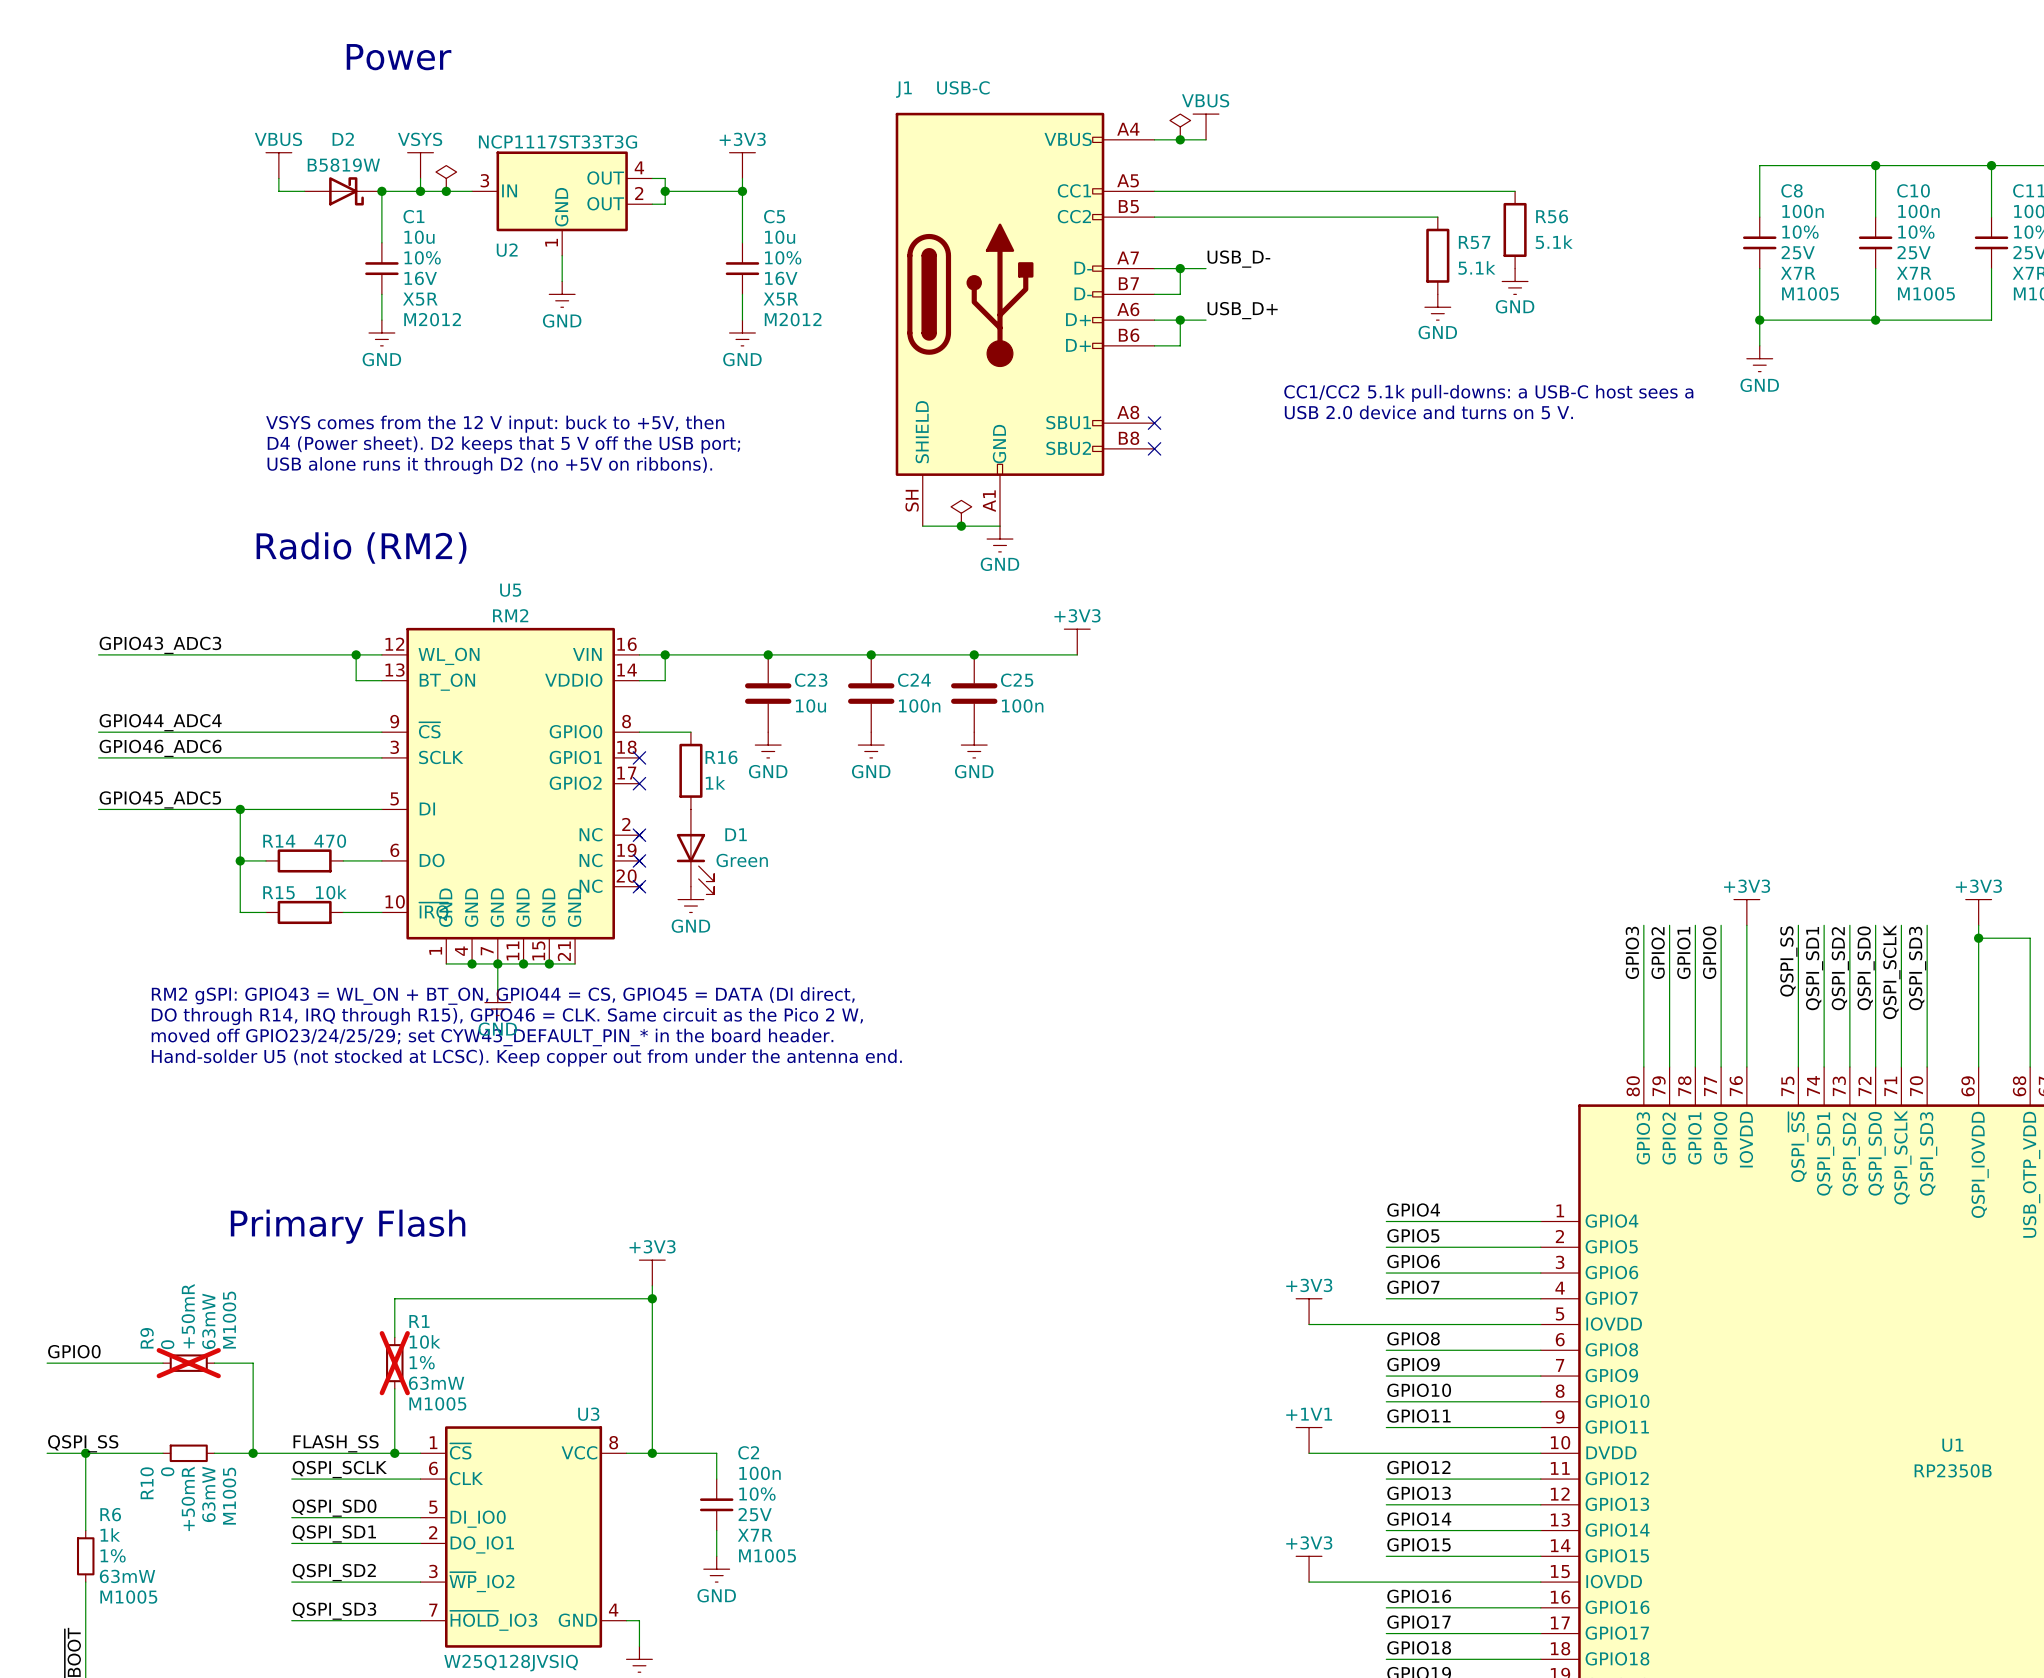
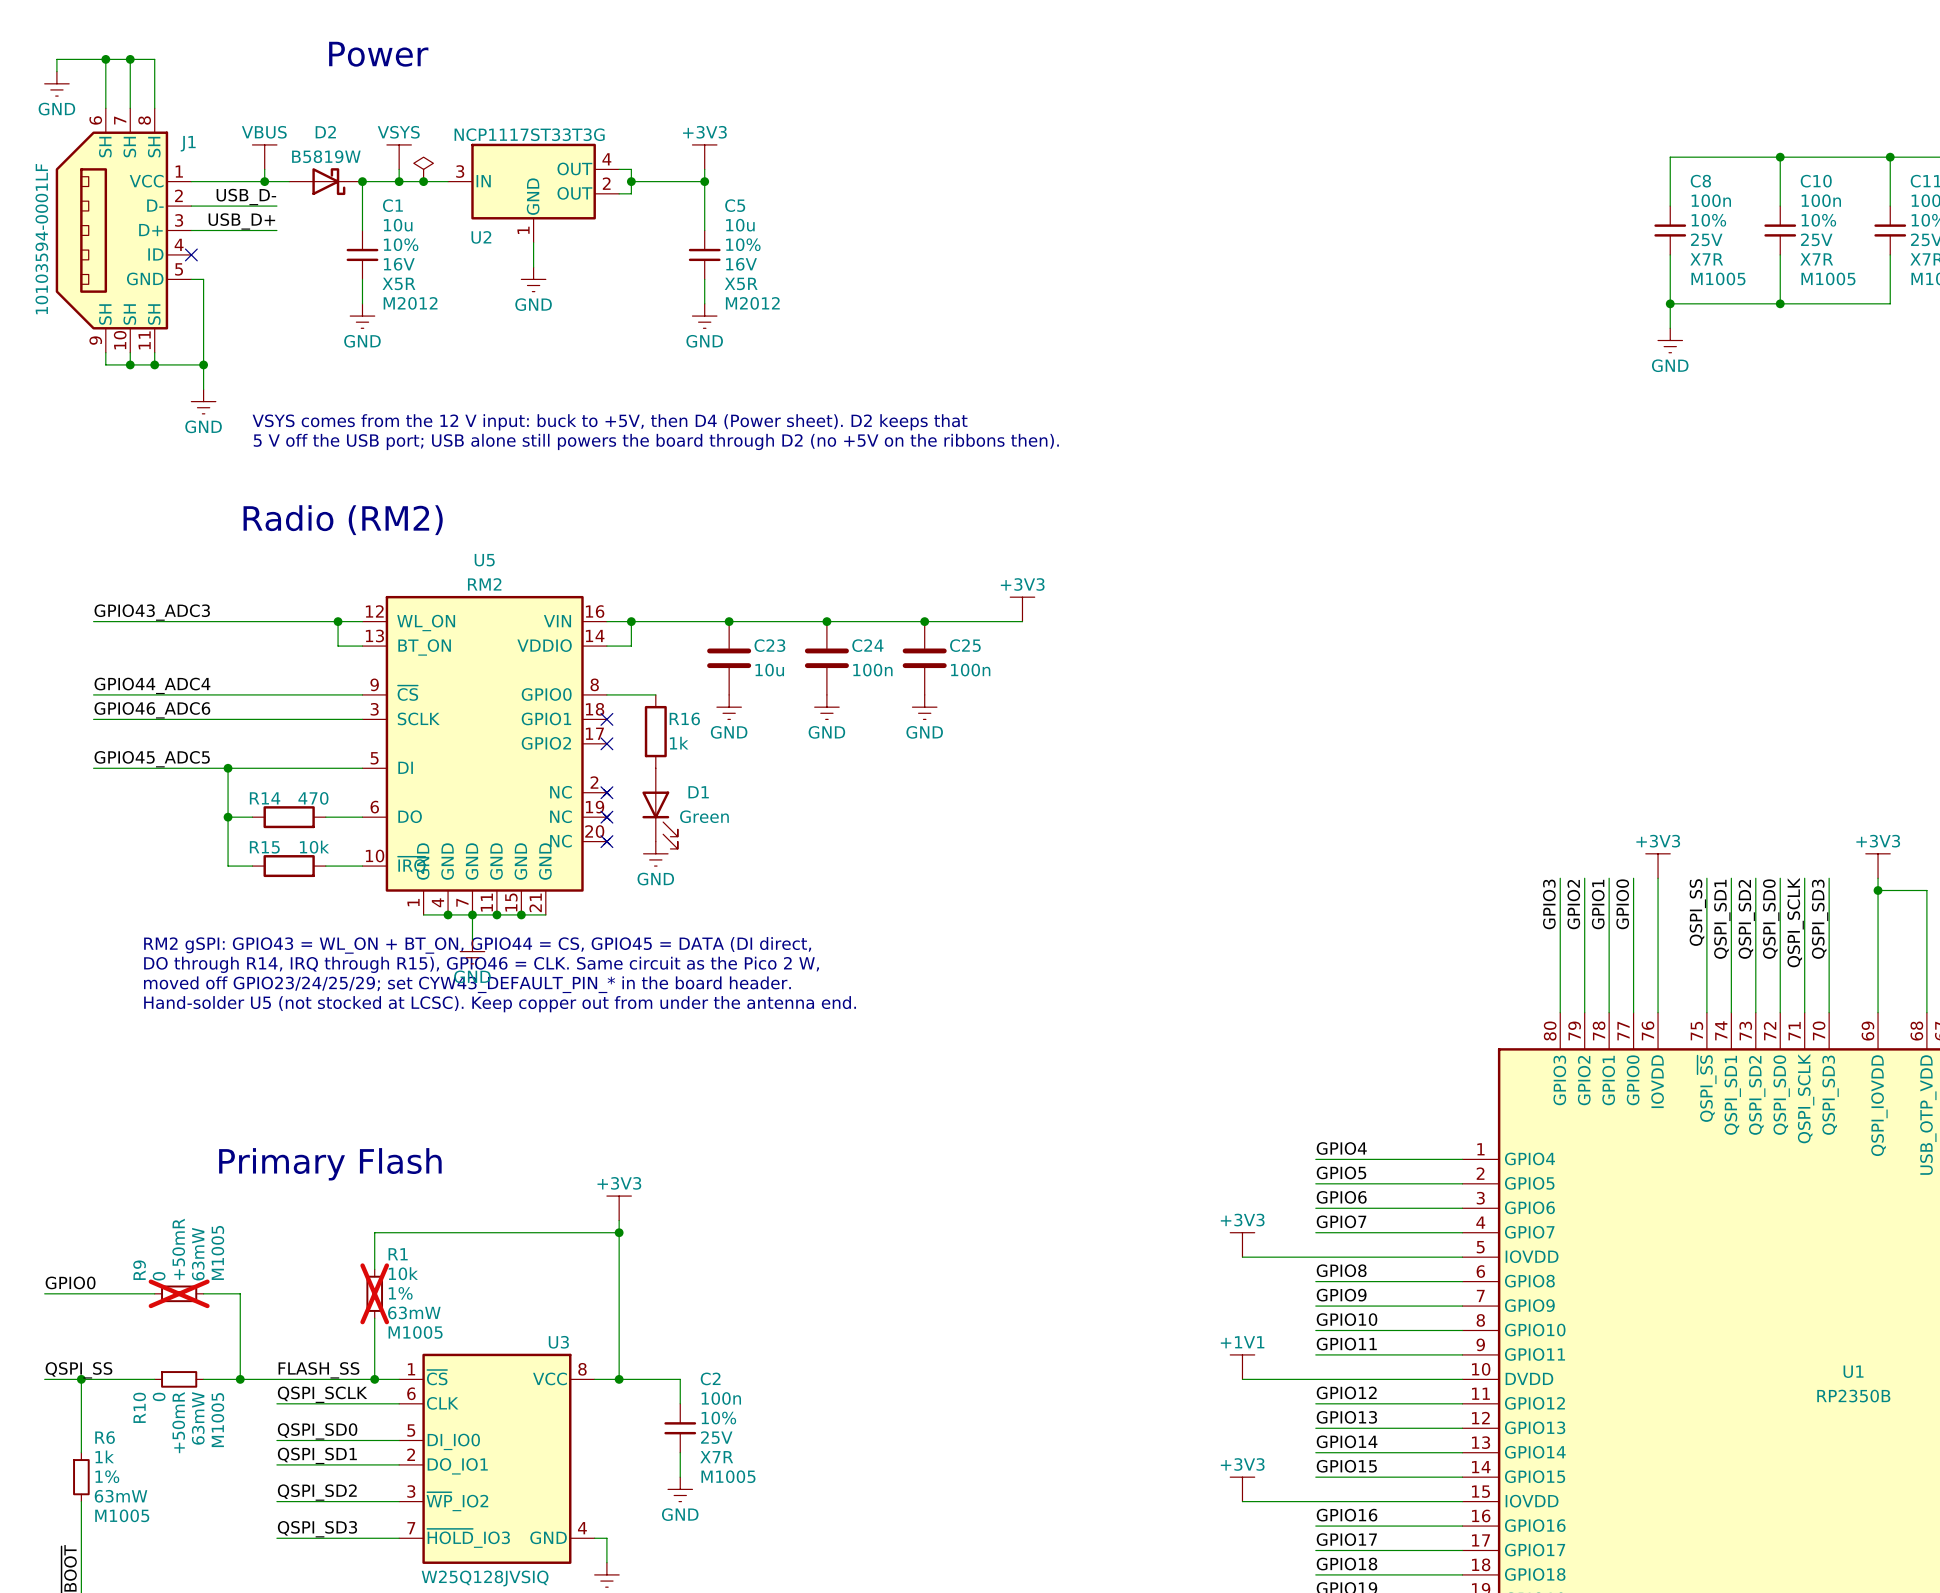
wire: none -> (105, 59) (105, 108)
junction: none -> (105, 59)
wire: none -> (130, 59) (130, 108)
junction: none -> (130, 59)
wire: none -> (56, 71) (56, 59) (154, 59) (154, 108)
J1 value: USB-C (963, 87) -> 10103594-0001LF (41, 239)
power symbol: none -> GND (56, 83)
J1 name position: J1 (903, 89) -> J1 (188, 143)
J1 symbol: [895, 112, 1155, 527] -> [55, 108, 192, 353]
power symbol: (1180, 126) -> none
power symbol: VBUS (1206, 126) -> none
wire: (1154, 139) (1206, 139) -> none
junction: (1180, 139) -> none
wire: none -> (191, 181) (264, 181)
junction: none -> (264, 181)
wire: (1154, 191) (1515, 191) -> none
label: none -> USB_D- (246, 197)
wire: none -> (191, 206) (276, 206)
wire: (1154, 217) (1437, 217) -> none
R56: 5.1k (1515, 229) -> none
label: none -> USB_D+ (241, 221)
wire: none -> (191, 230) (276, 230)
R57: 5.1k (1437, 255) -> none
label: USB_D- (1238, 259) -> none
no-connect mark: none -> (191, 254)
wire: (1154, 268) (1206, 268) -> none
wire: (1180, 268) (1180, 294) (1154, 294) -> none
junction: (1180, 268) -> none
power symbol: GND (1515, 281) -> none
wire: none -> (191, 279) (203, 279) (203, 389)
power symbol: GND (1437, 307) -> none
label: USB_D+ (1242, 310) -> none
wire: (1154, 320) (1206, 320) -> none
wire: (1180, 320) (1180, 345) (1154, 345) -> none
junction: (1180, 320) -> none
wire: none -> (105, 352) (105, 364) (203, 364)
wire: none -> (130, 352) (130, 364)
wire: none -> (154, 352) (154, 364)
junction: none -> (130, 364)
junction: none -> (154, 364)
junction: none -> (203, 364)
text: CC1/CC2 5.1k pull-downs: a USB-C host sees a (1488, 393) -> none
text: USB 2.0 device and turns on 5 V. (1428, 412) -> none
power symbol: none -> GND (203, 401)
no-connect mark: (1154, 423) -> none
text: VSYS comes from the 12 V input: buck to +5V, then (495, 424) -> none
text: D4 (Power sheet). D2 keeps that 5 V off the USB port; (503, 444) -> VSYS comes from the 12 V input: buck to +5V, then D4 (Power sheet). D2 keeps that (610, 422)
no-connect mark: (1154, 448) -> none
text: USB alone runs it through D2 (no +5V on ribbons). (489, 465) -> 5 V off the USB port; USB alone still powers the board through D2 (no +5V on the ribbons then). (656, 441)
power symbol: (961, 513) -> none
wire: (922, 526) (1000, 526) -> none
junction: (961, 526) -> none
power symbol: GND (1000, 539) -> none

